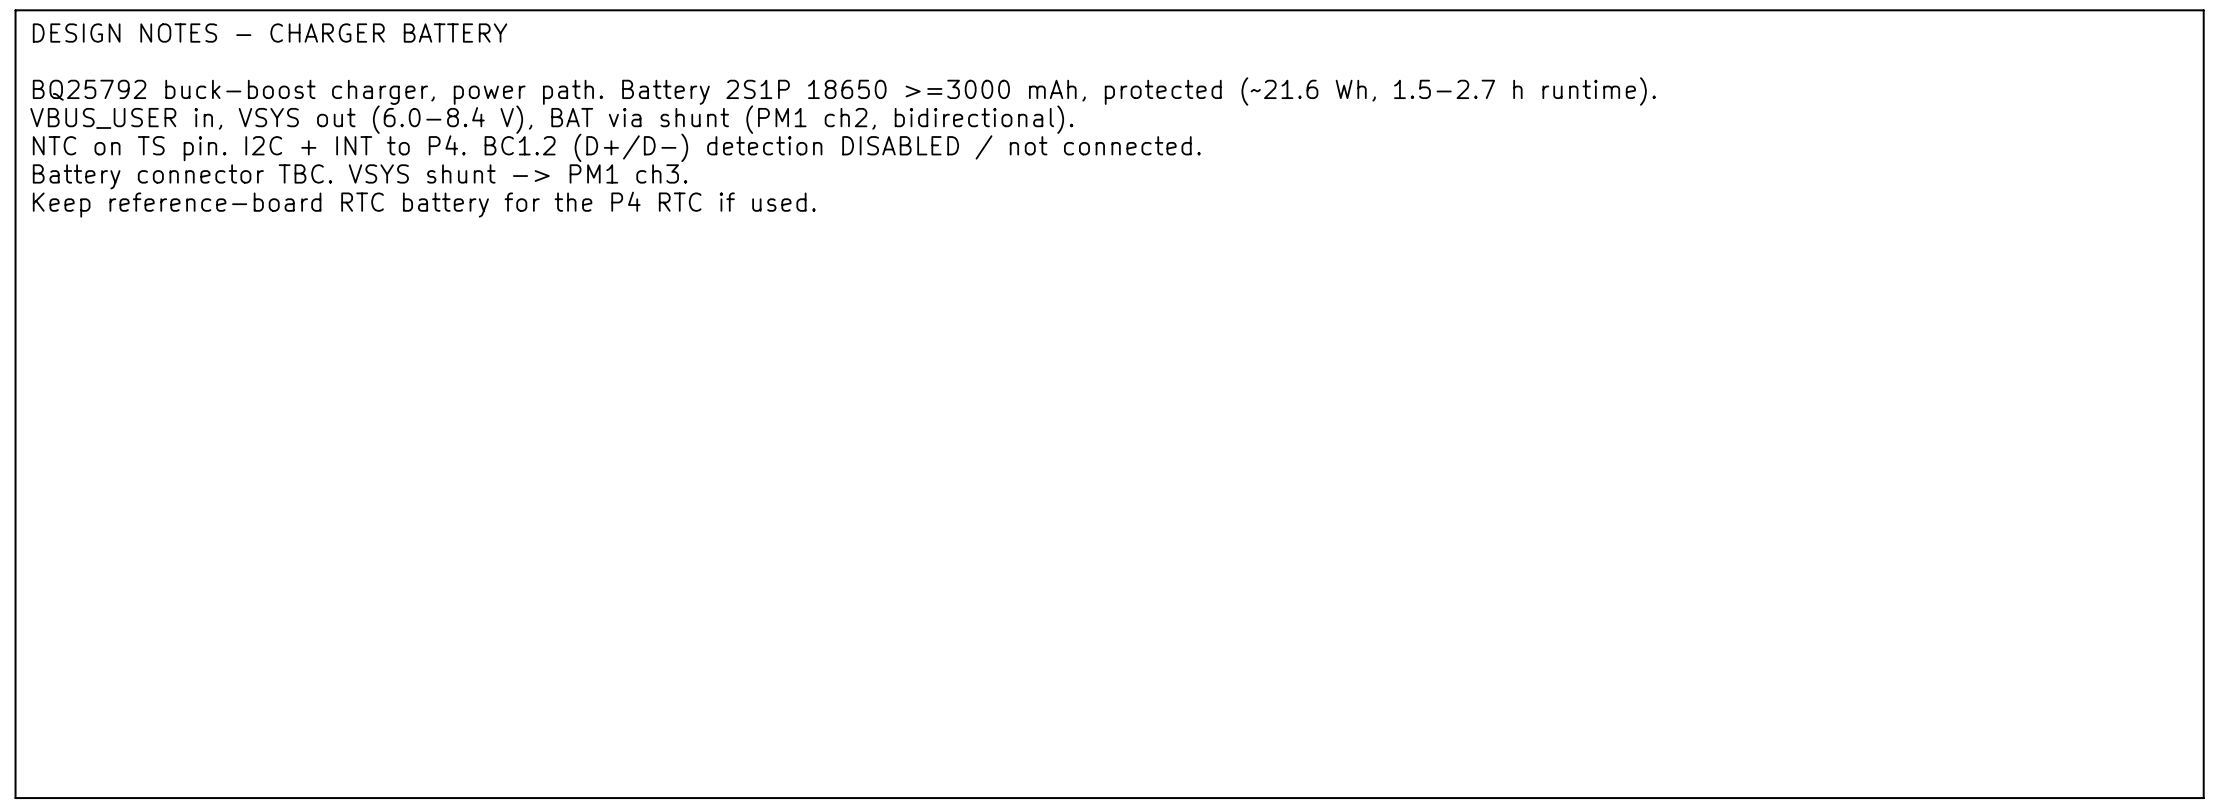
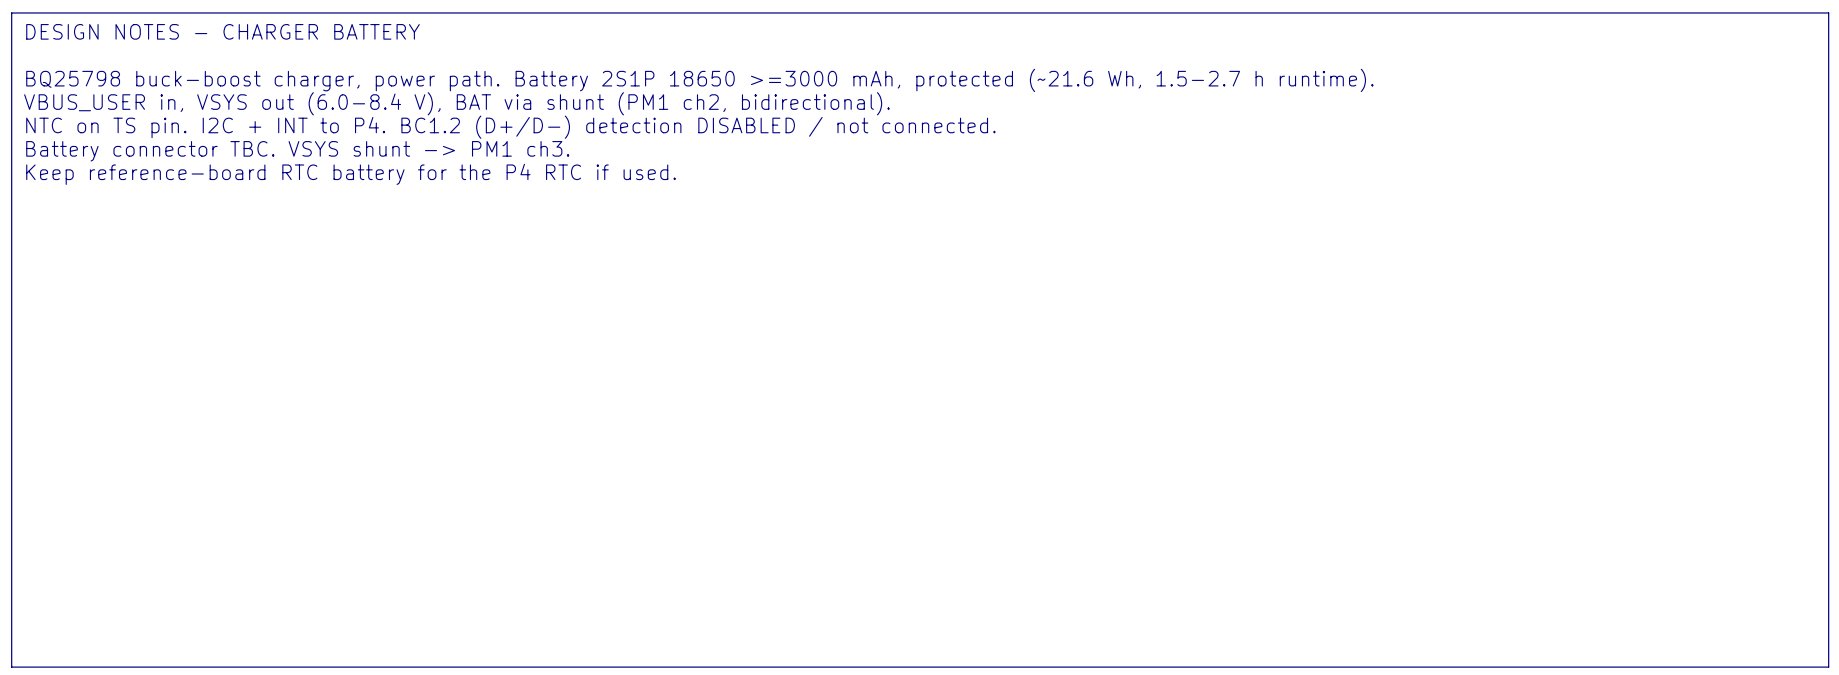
text: BQ25792 buck-boost charger, power path. Battery 2S1P 18650 >=3000 mAh, protected (~21.6 Wh, 1.5-2.7 h runtime). (844, 91) -> BQ25798 buck-boost charger, power path. Battery 2S1P 18650 >=3000 mAh, protected (~21.6 Wh, 1.5-2.7 h runtime). (699, 80)

